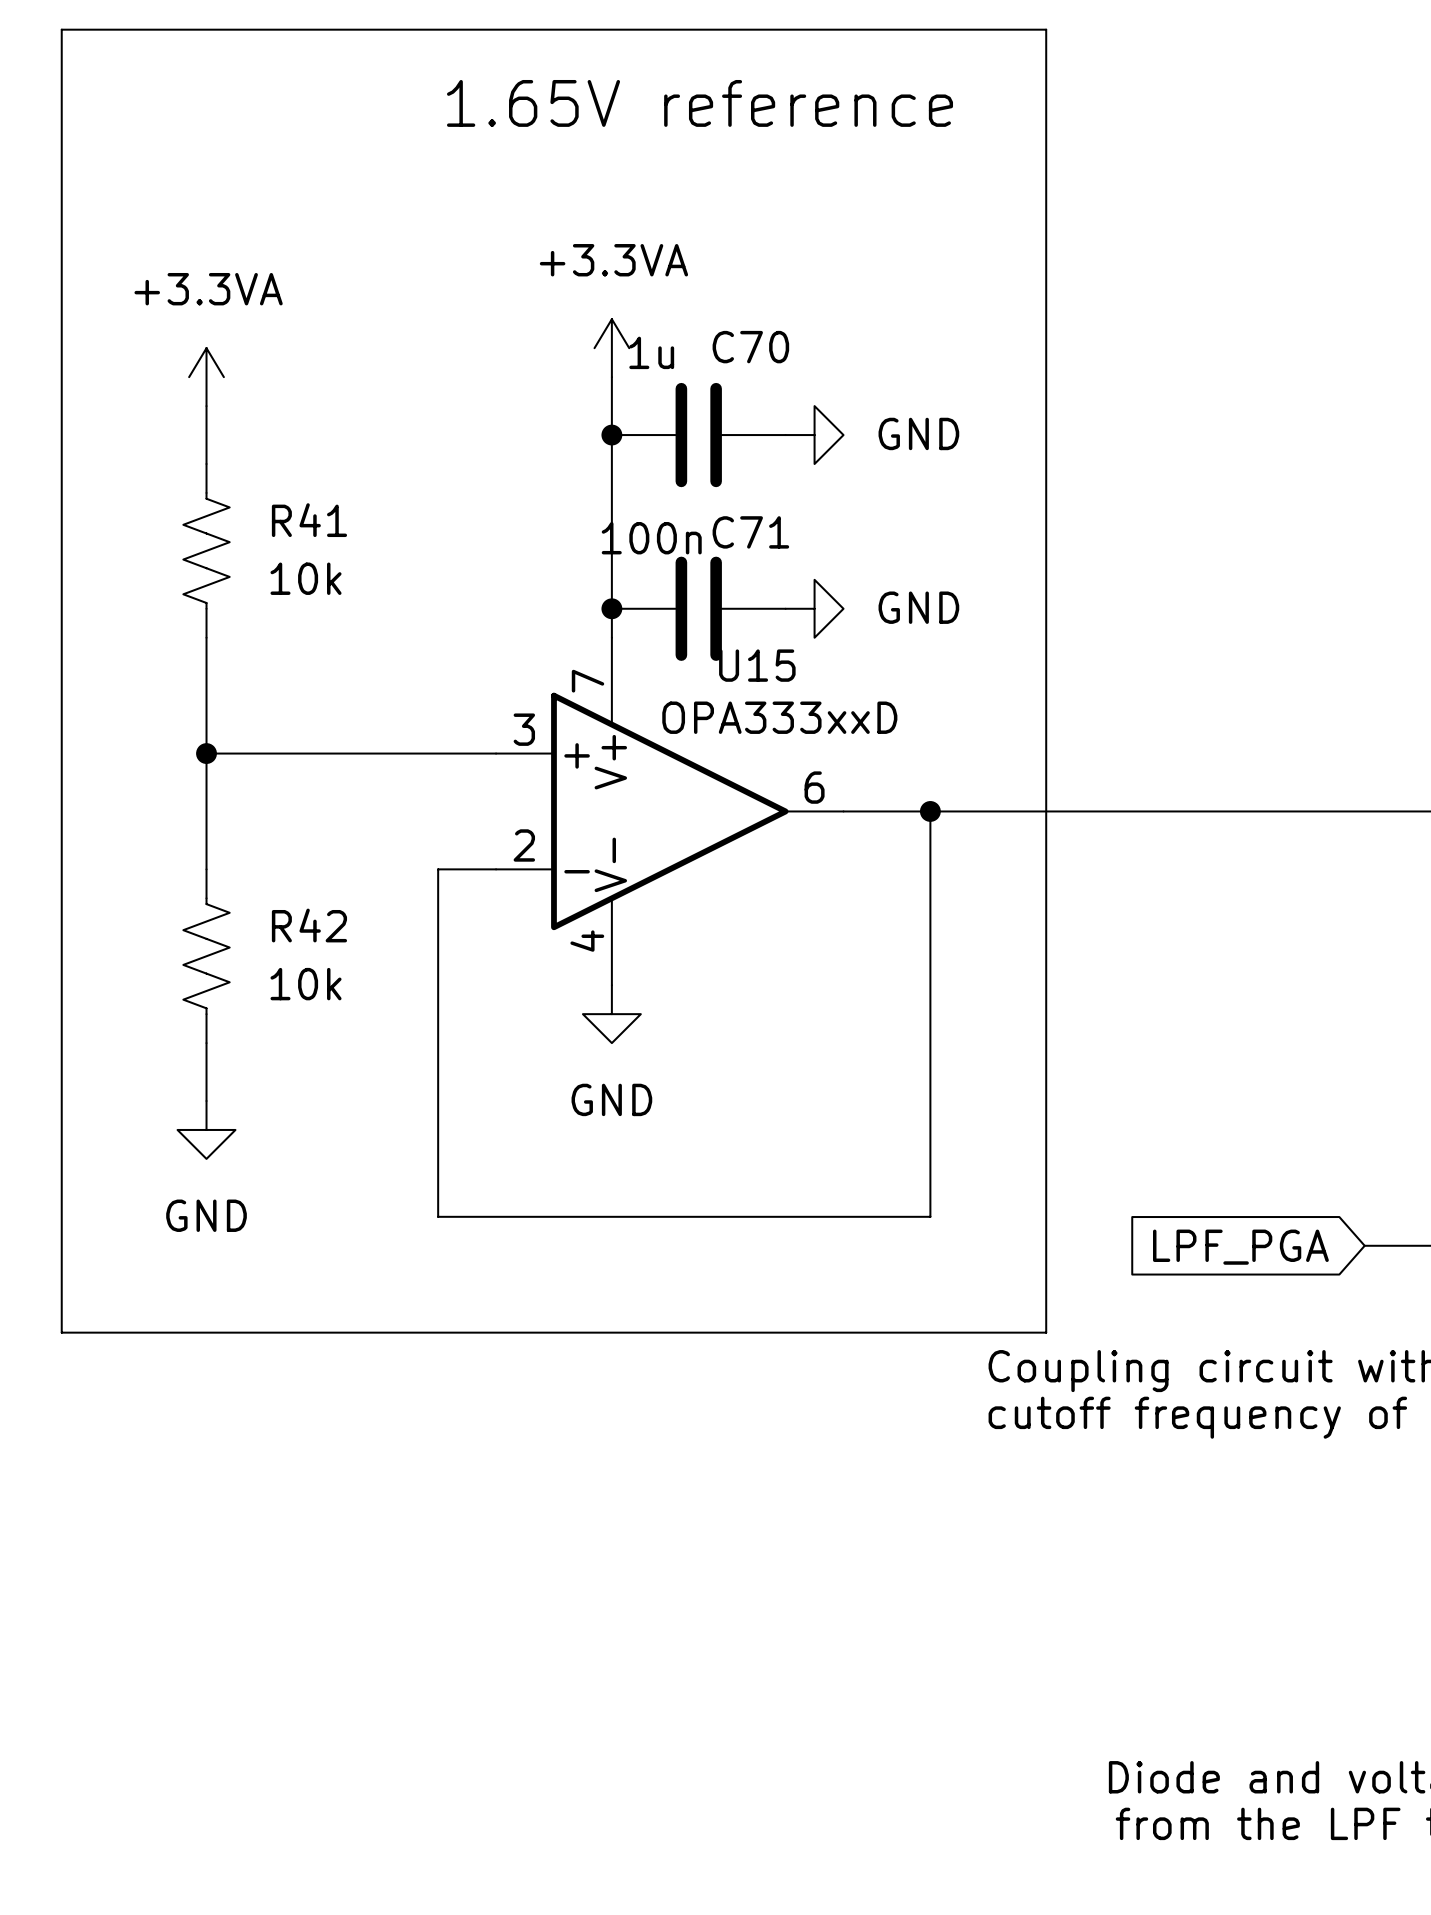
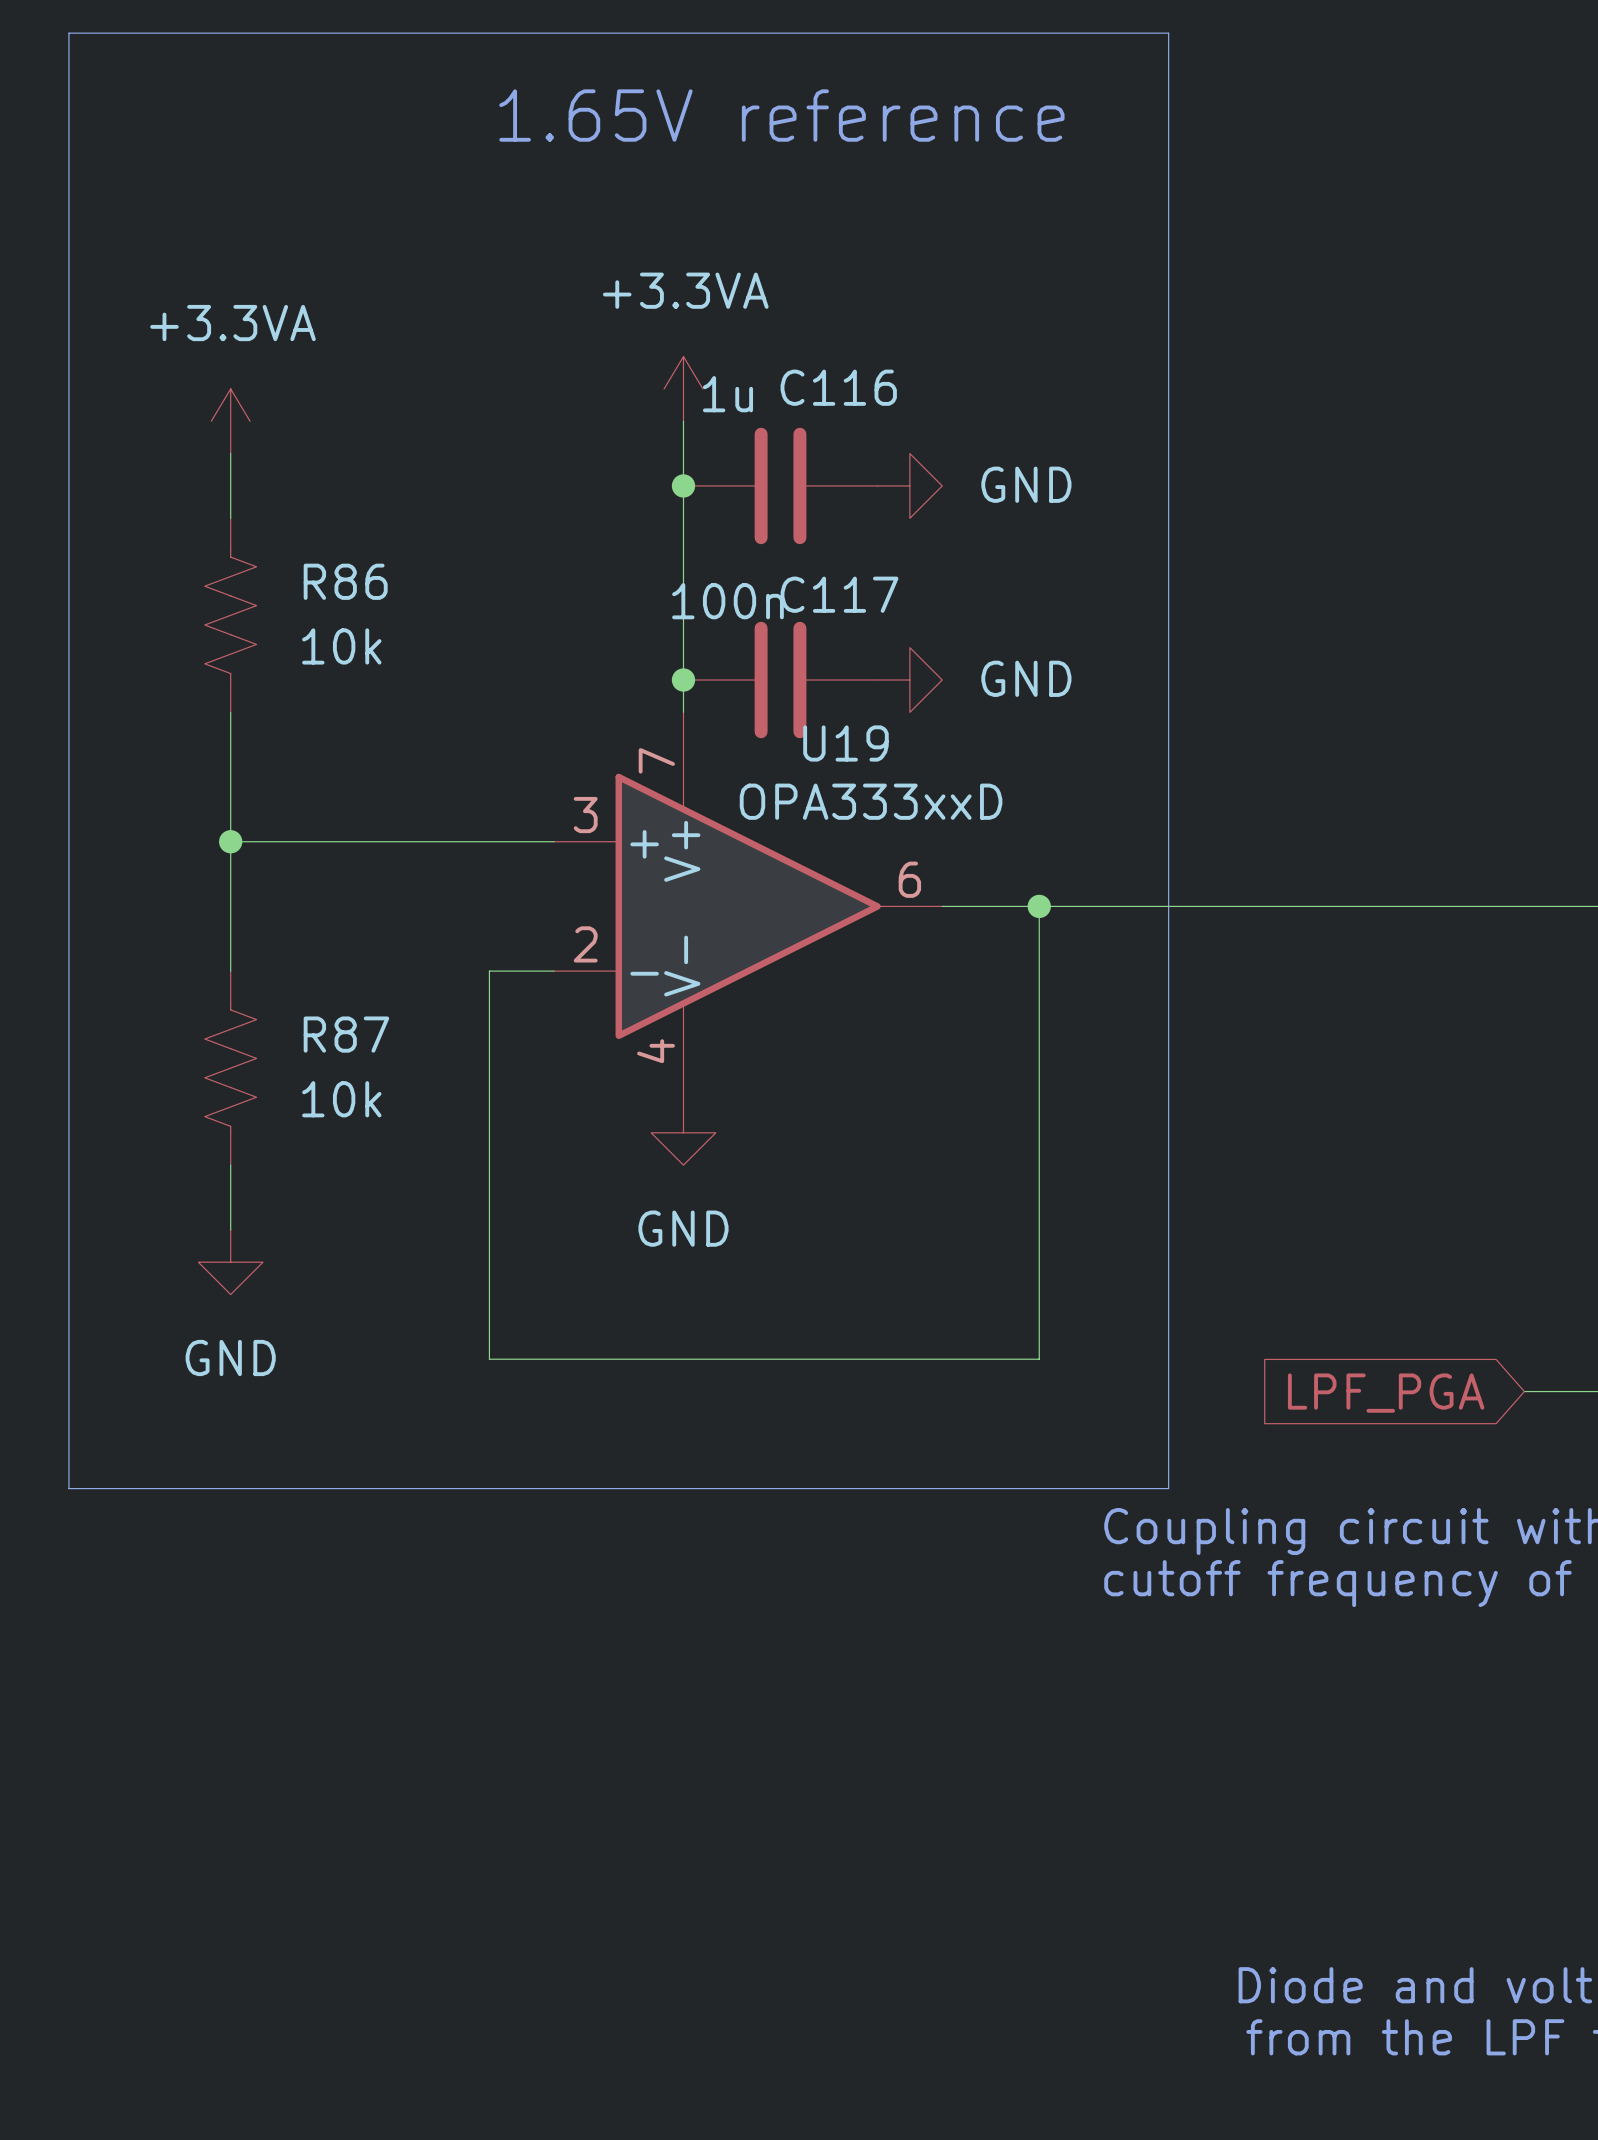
C70 name: C70 (750, 347) -> C116 (838, 387)
R41 name: R41 (309, 520) -> R86 (345, 581)
C71 name: C71 (750, 532) -> C117 (839, 594)
U15 name: U15 (757, 665) -> U19 (845, 743)
R42 name: R42 (309, 925) -> R87 (346, 1034)

